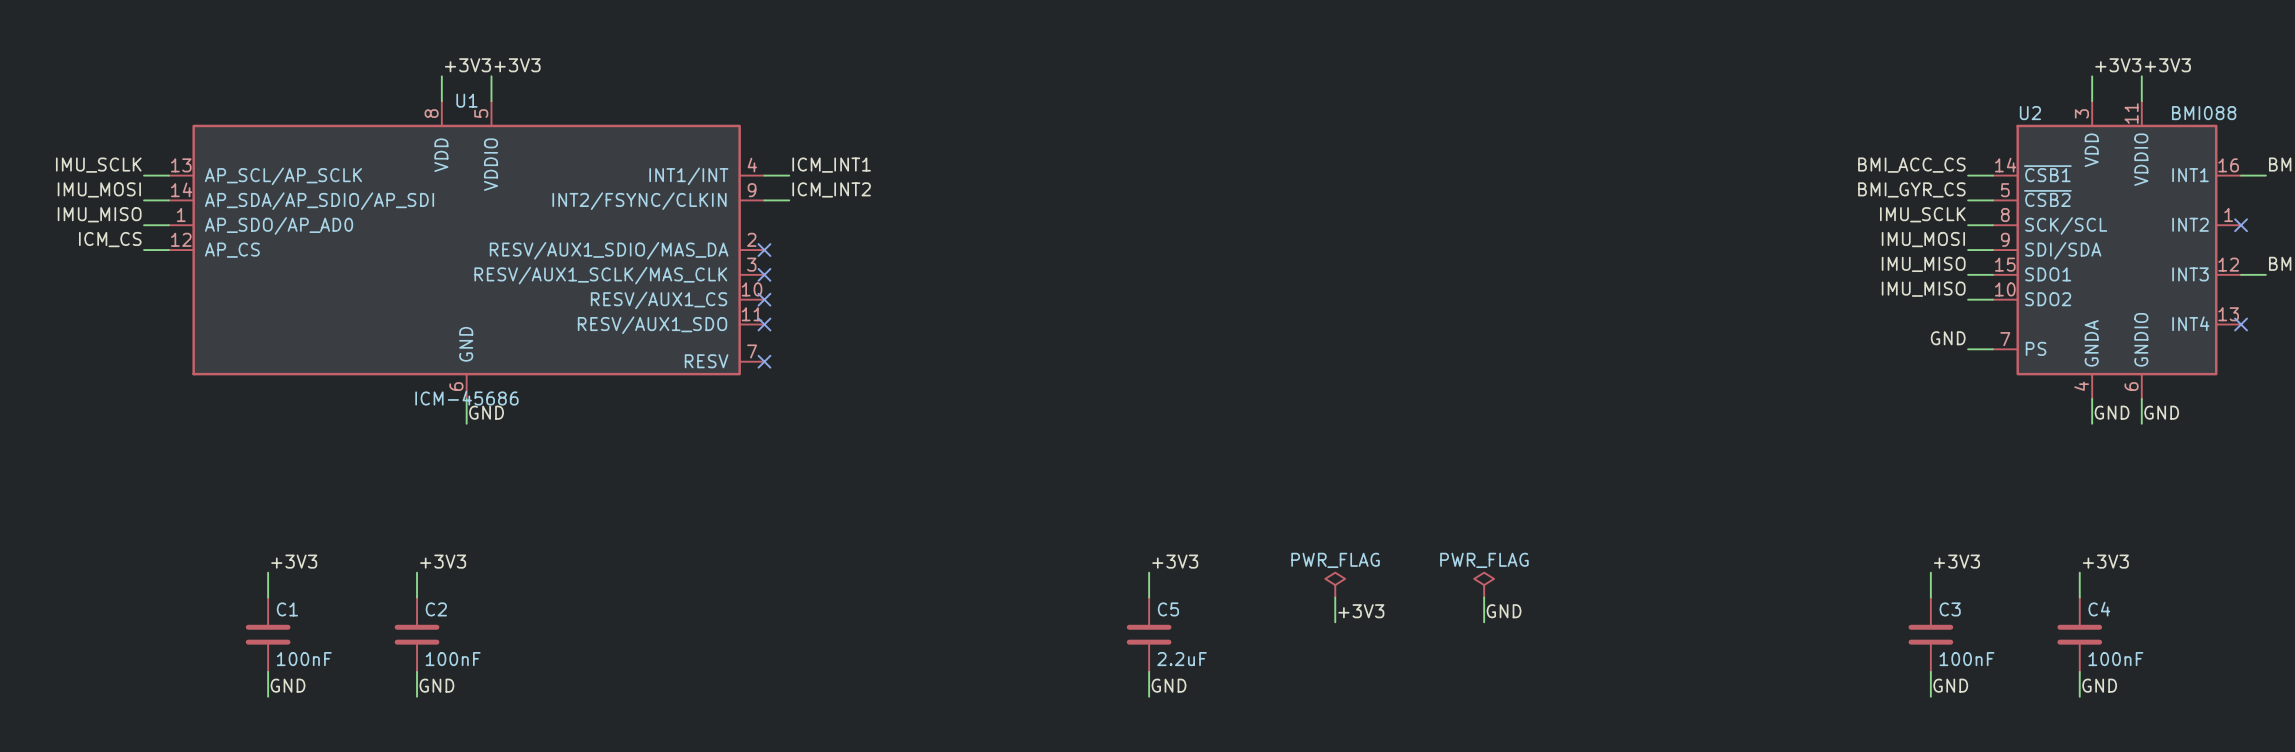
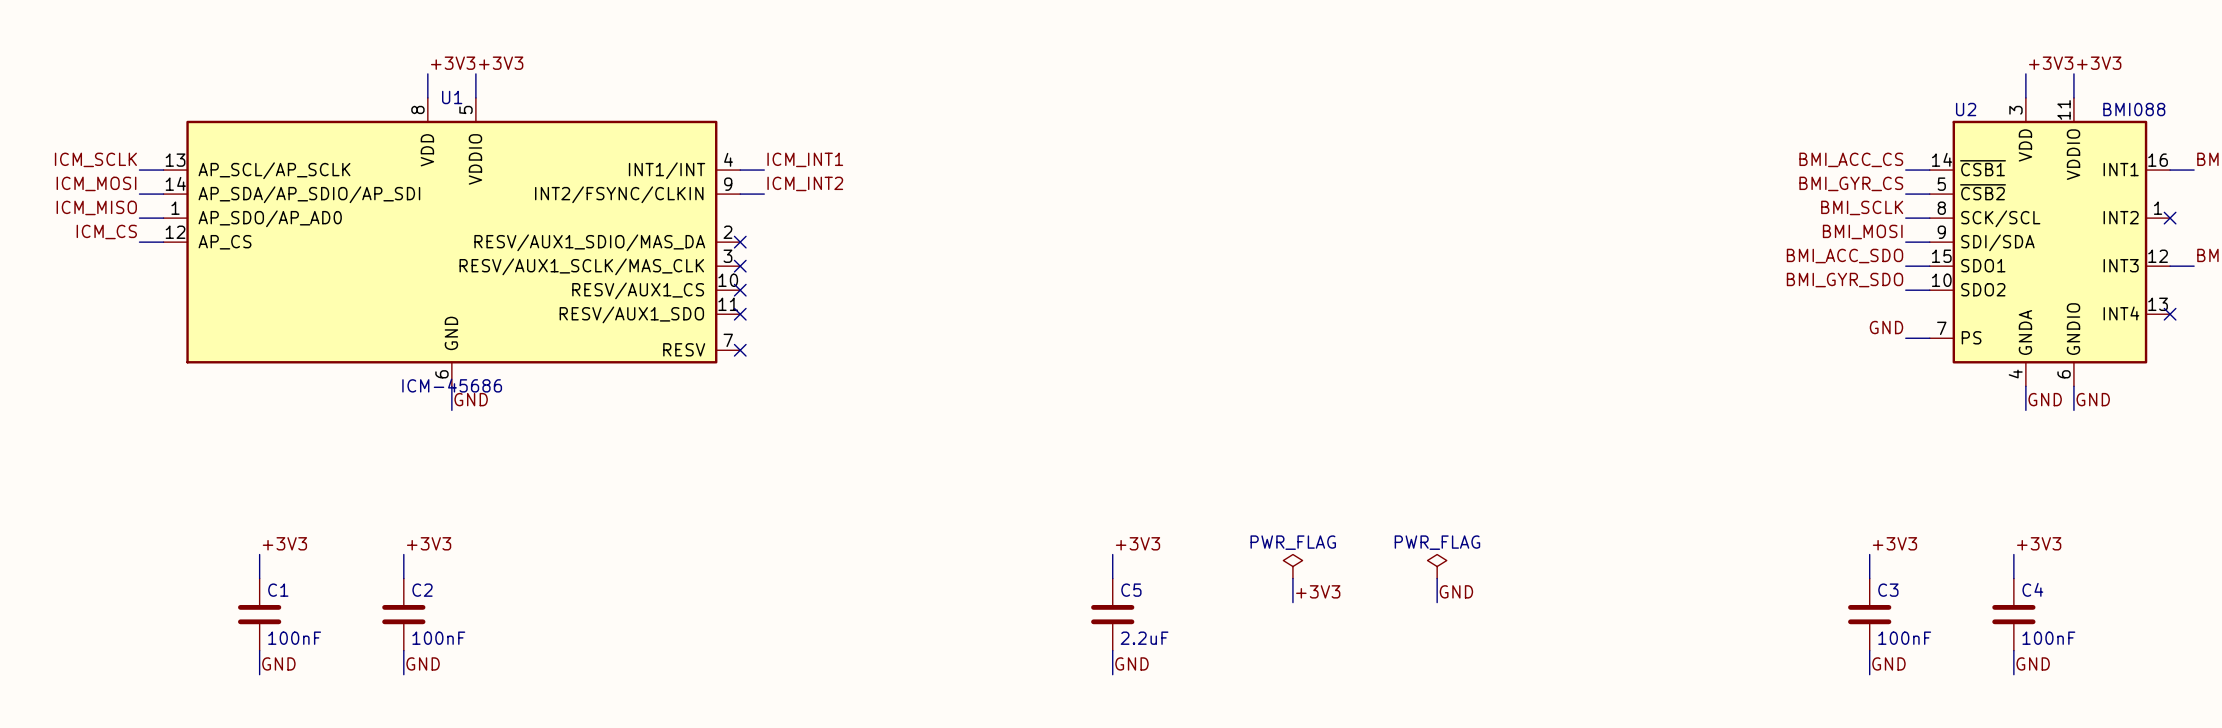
label: IMU_SCLK (98, 165) -> ICM_SCLK (95, 159)
label: IMU_MOSI (99, 189) -> ICM_MOSI (96, 183)
label: IMU_MISO (99, 214) -> ICM_MISO (96, 207)
label: IMU_SCLK (1922, 214) -> BMI_SCLK (1862, 207)
label: IMU_MOSI (1923, 239) -> BMI_MOSI (1862, 231)
label: IMU_MISO (1923, 264) -> BMI_ACC_SDO (1845, 256)
label: IMU_MISO (1923, 289) -> BMI_GYR_SDO (1845, 280)

